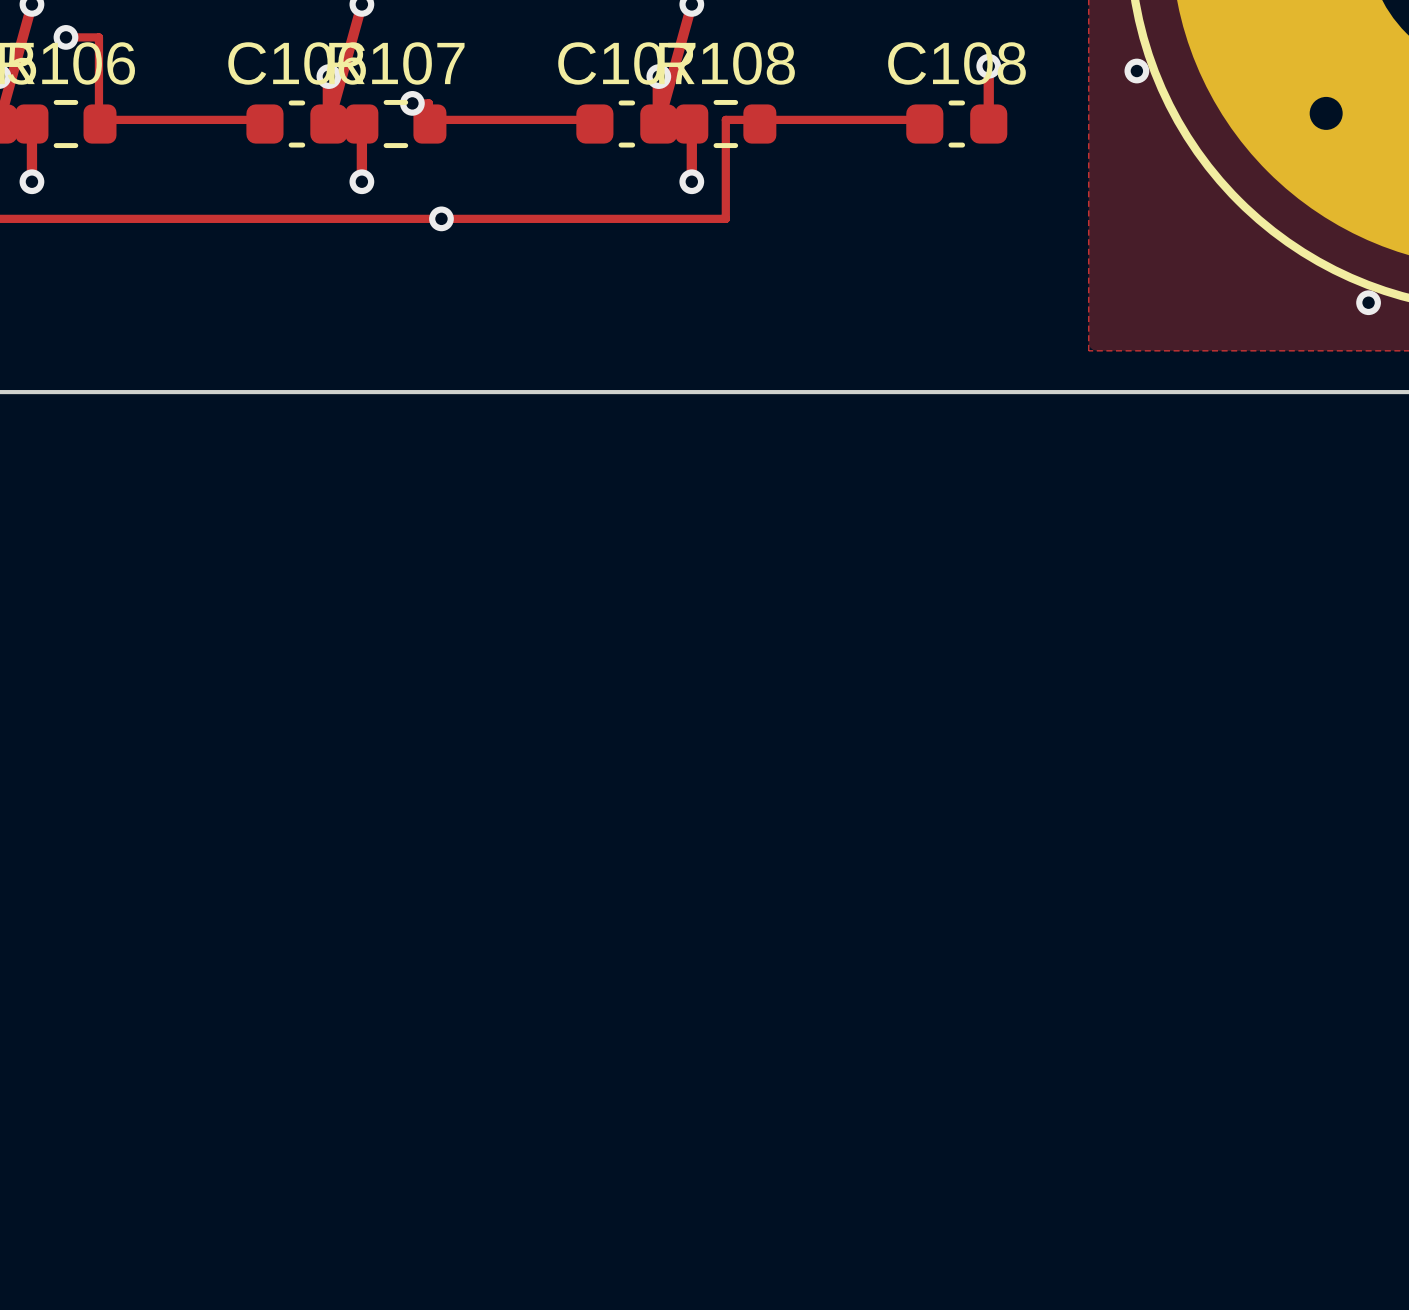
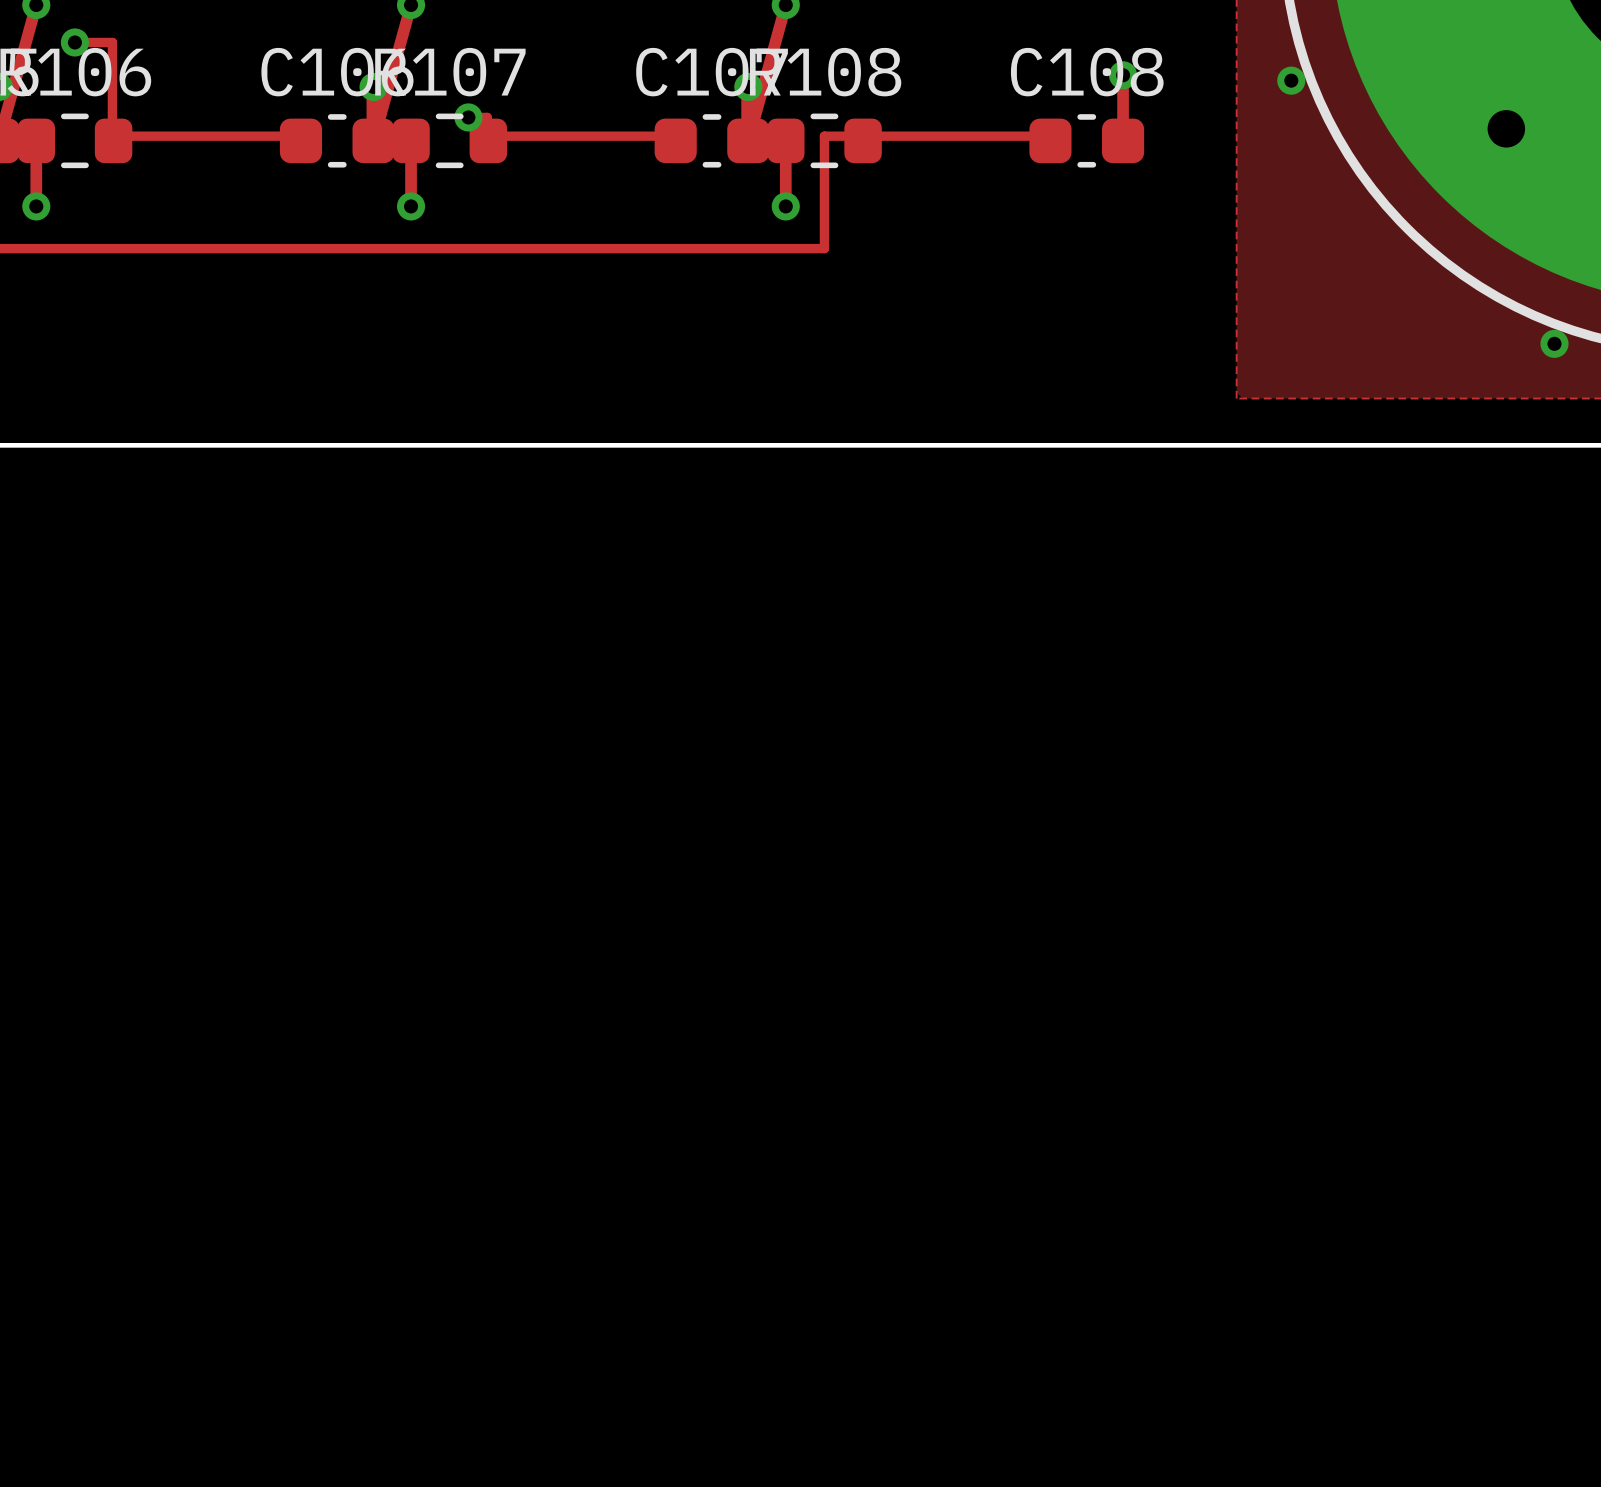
via: (441, 218) -> none

